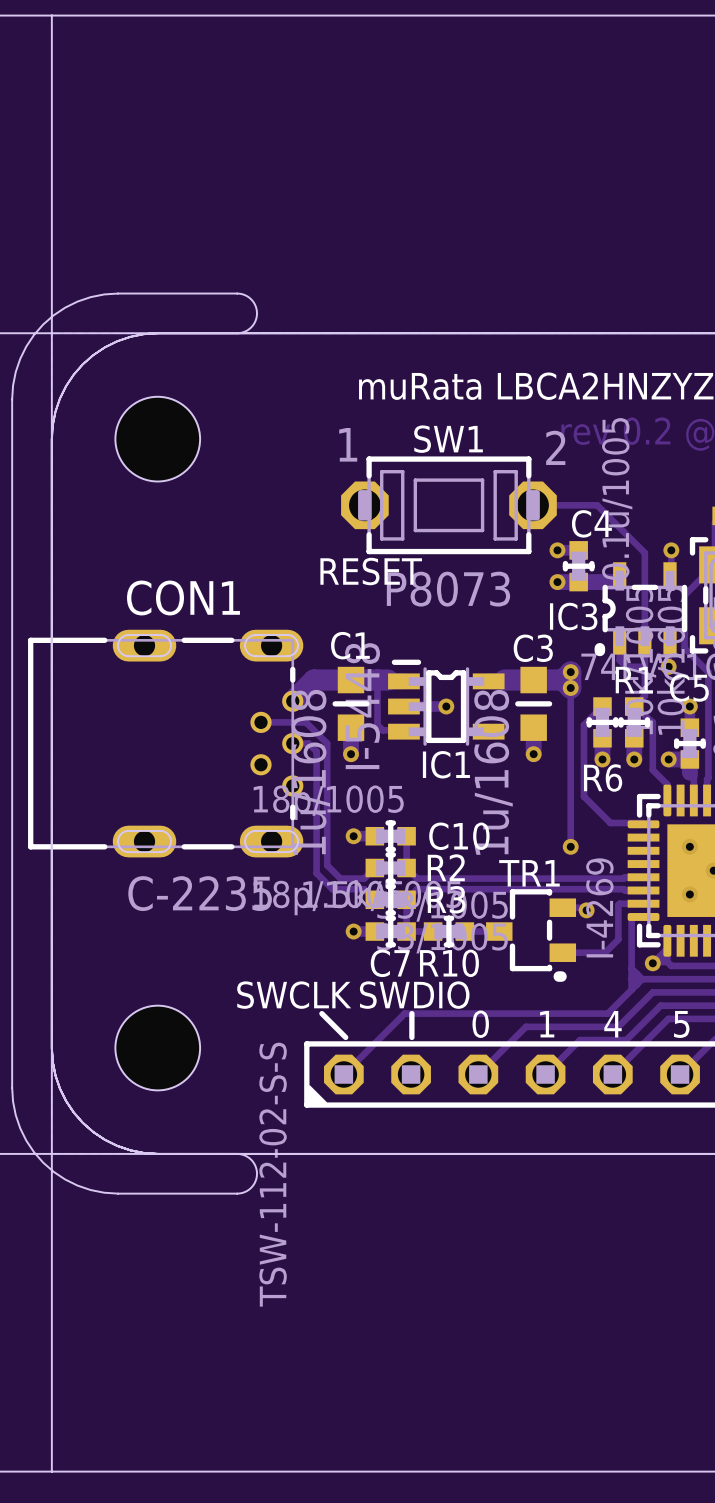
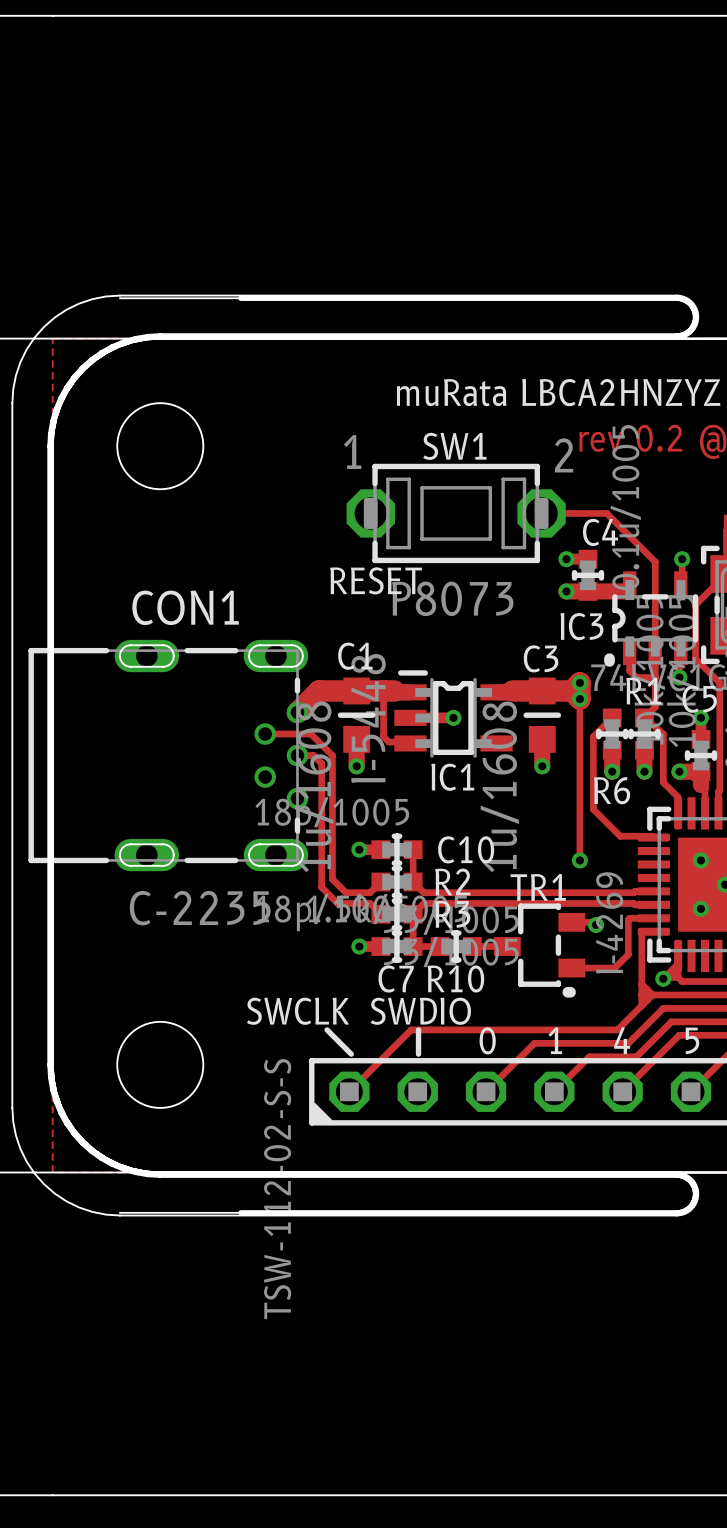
board edge: (51, 15) (51, 439) -> none
board edge: (118, 293) (104, 294) (77, 301) (65, 307) (43, 324) (26, 346) (20, 358) (13, 385) (12, 399) -> (676, 338) (684, 336) (691, 332) (698, 319) (697, 311) (693, 303) (687, 298) (679, 295) (105, 296) (92, 299) (66, 309) (43, 327) (34, 337) (26, 349) (16, 375) (12, 405)
board edge: (237, 293) (244, 295) (251, 299) (255, 305) (257, 313) (255, 320) (251, 327) (244, 331) (237, 333) -> (240, 298) (676, 298) (690, 303) (695, 317) (690, 330) (676, 335) (147, 336) (123, 342) (101, 352) (74, 377) (60, 398) (52, 421) (50, 446) (50, 1064) (56, 1101) (74, 1133) (101, 1158) (123, 1168) (147, 1174) (676, 1175) (690, 1180) (695, 1194) (690, 1207) (676, 1212) (240, 1212)
board edge: (51, 1048) (51, 1471) -> none
board edge: (12, 1087) (13, 1101) (20, 1128) (26, 1140) (43, 1162) (65, 1179) (77, 1185) (104, 1192) (118, 1193) -> (12, 1105) (16, 1135) (26, 1161) (34, 1173) (43, 1184) (66, 1201) (92, 1211) (105, 1214) (679, 1215) (687, 1212) (693, 1207) (697, 1199) (698, 1191) (691, 1178) (684, 1174) (676, 1172)
board edge: (237, 1153) (244, 1155) (251, 1159) (255, 1166) (257, 1173) (255, 1181) (251, 1187) (244, 1192) (237, 1193) -> none

